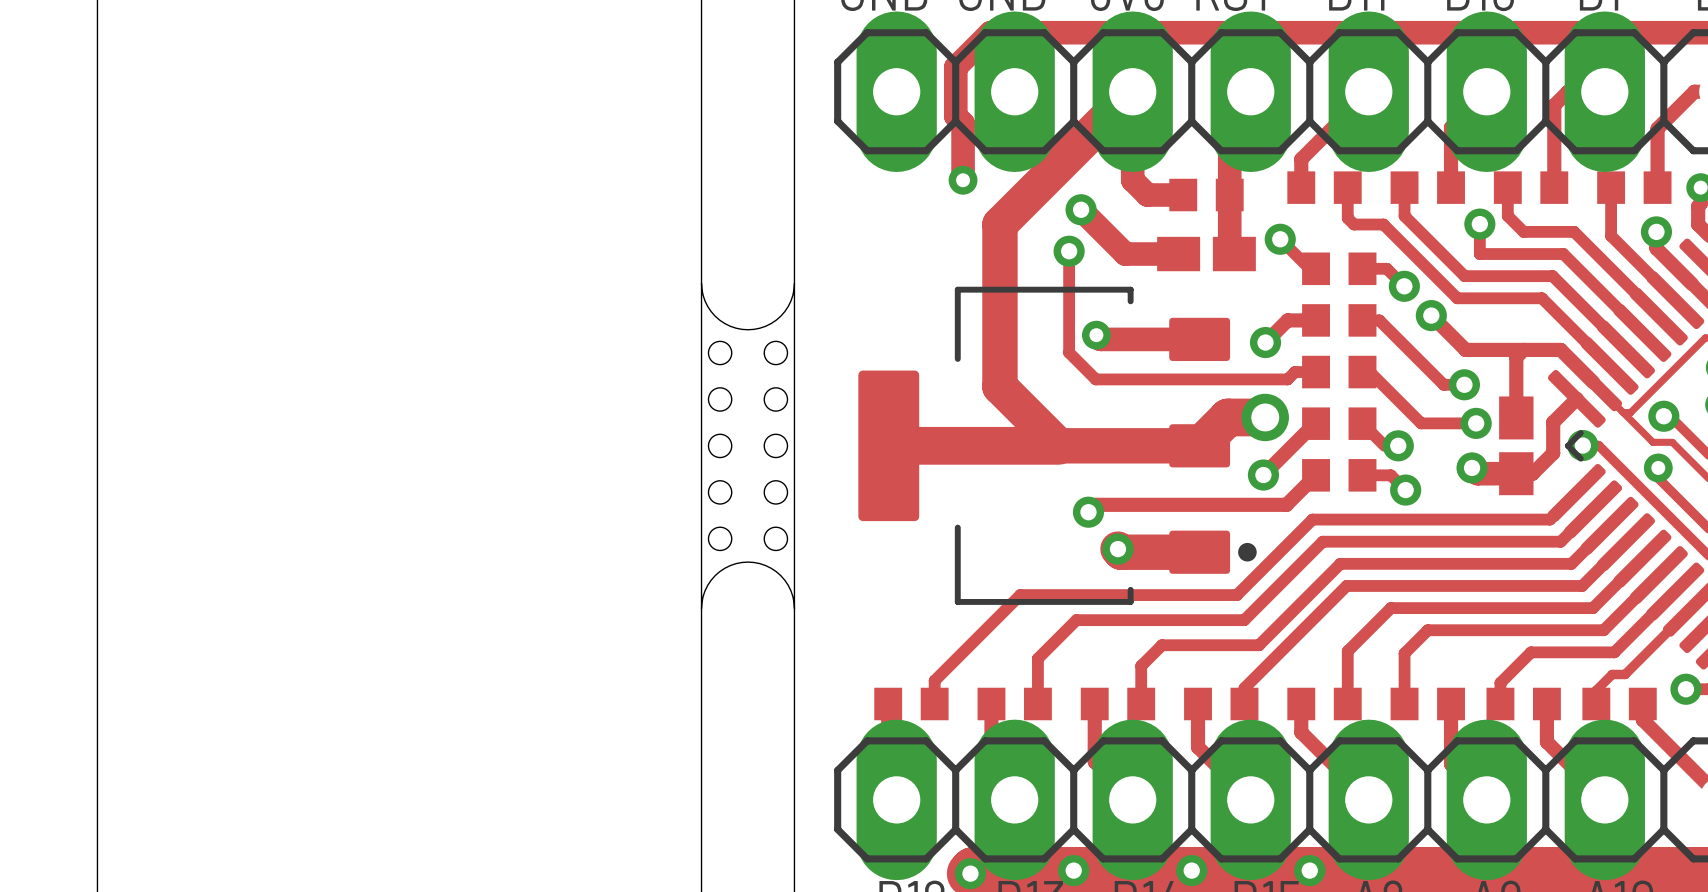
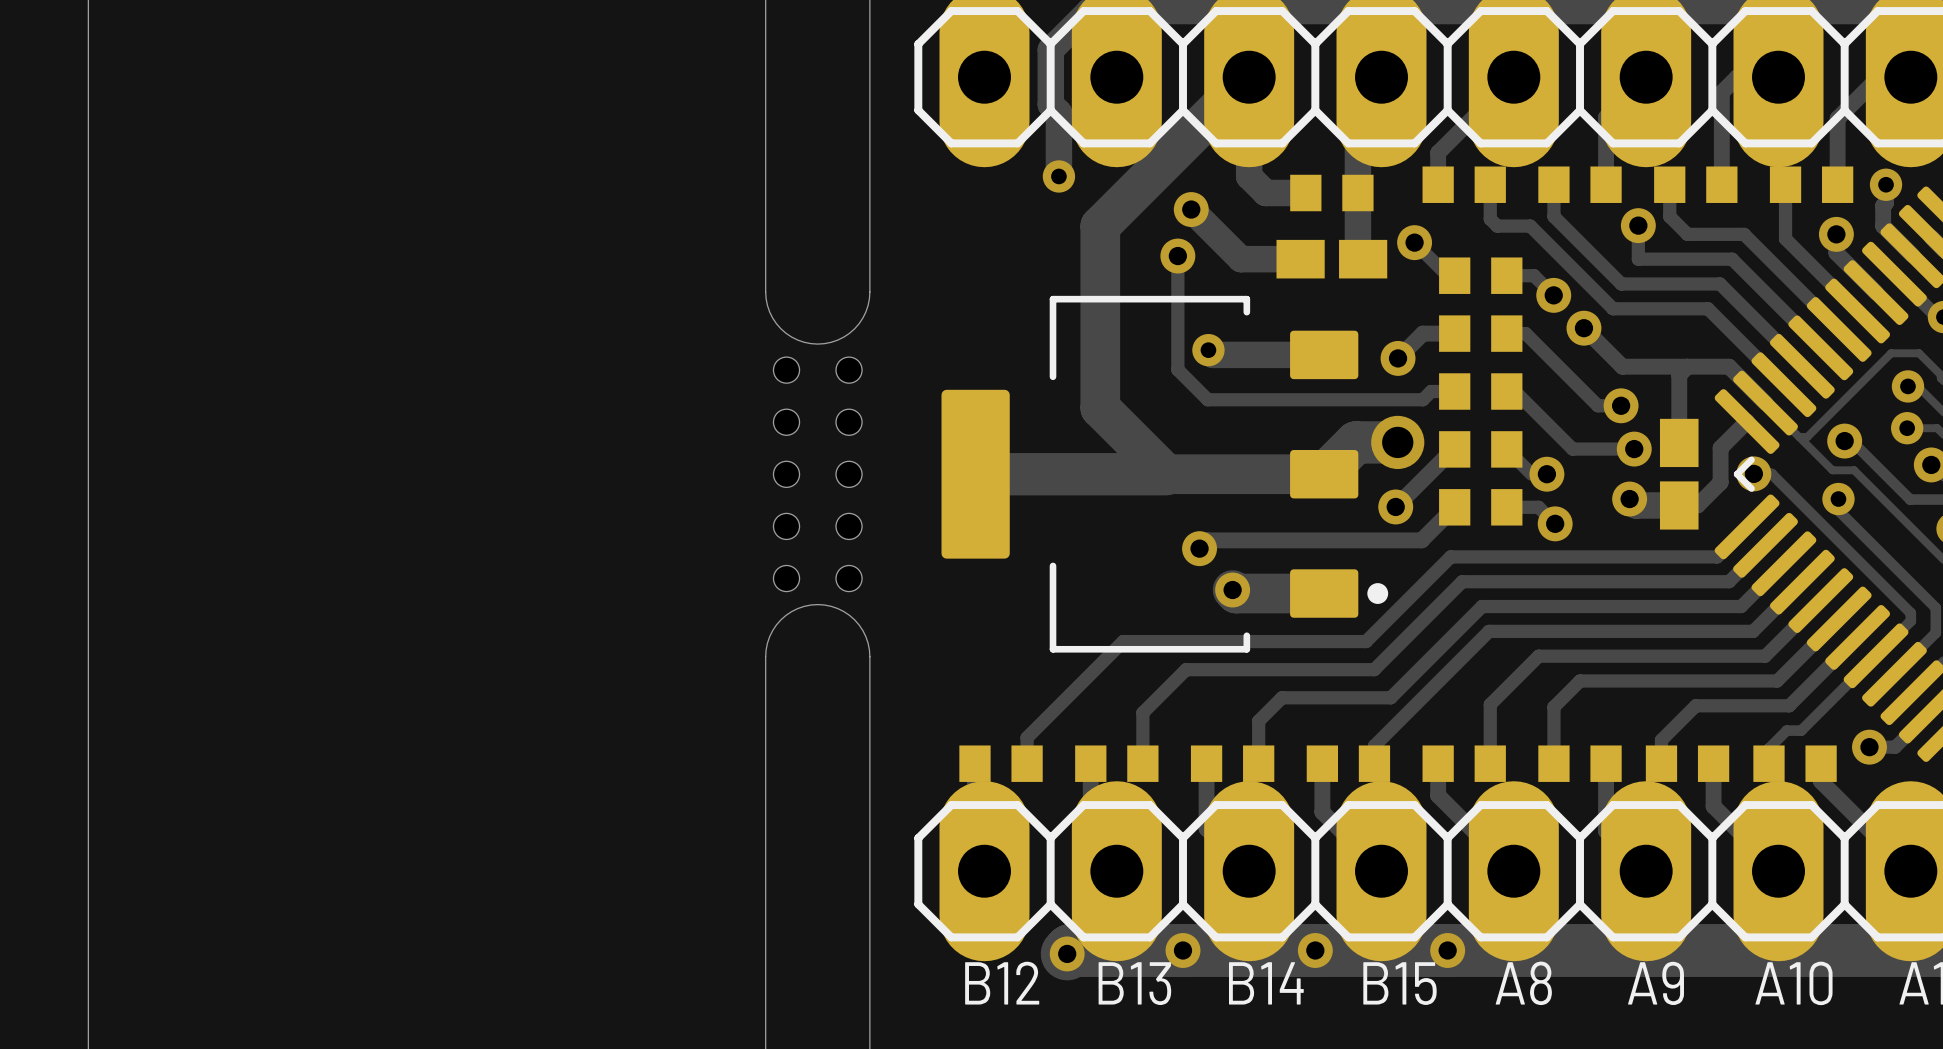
board edge: (701, 283) (701, 608) -> none
board edge: (794, 283) (794, 608) -> none

